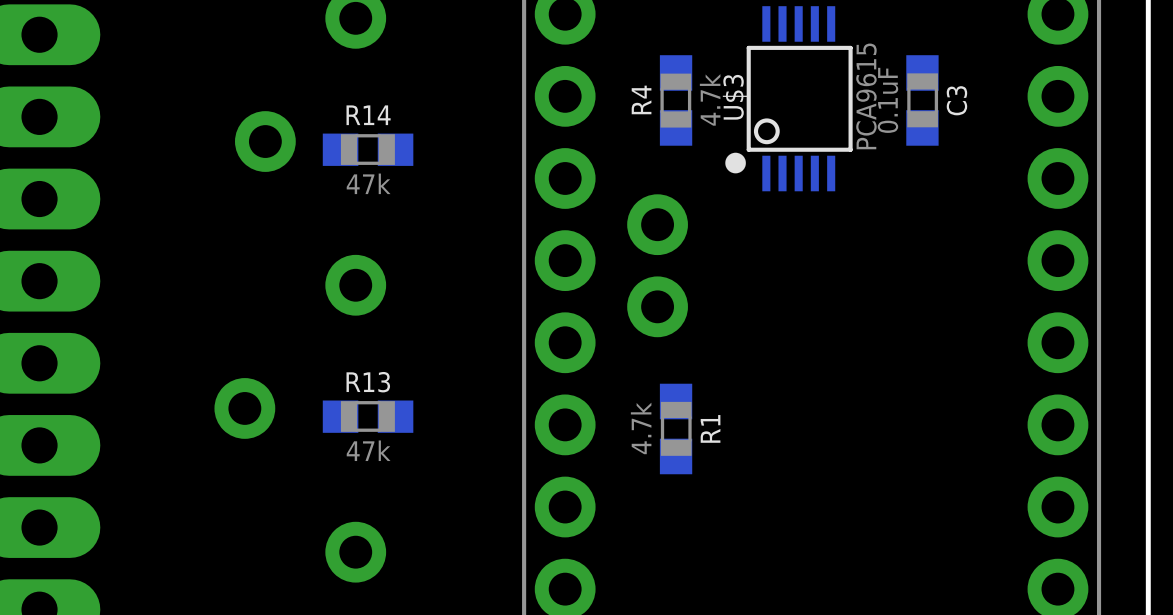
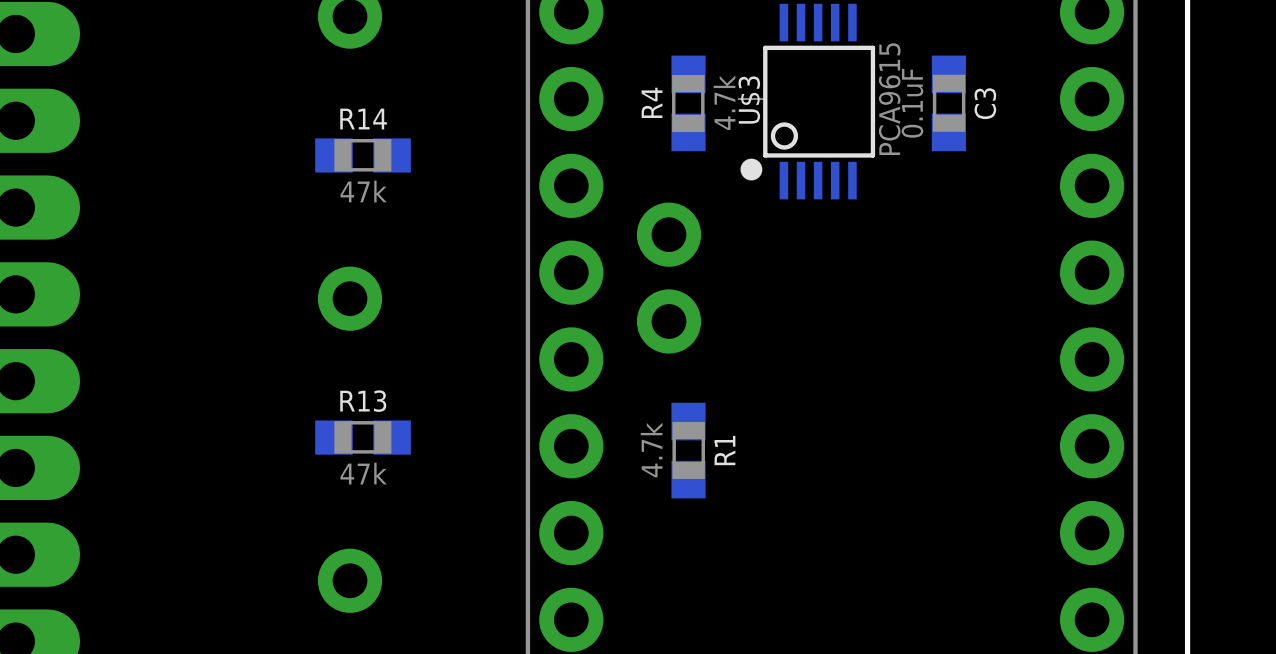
part: (265, 141) -> none
part: (244, 408) -> none

